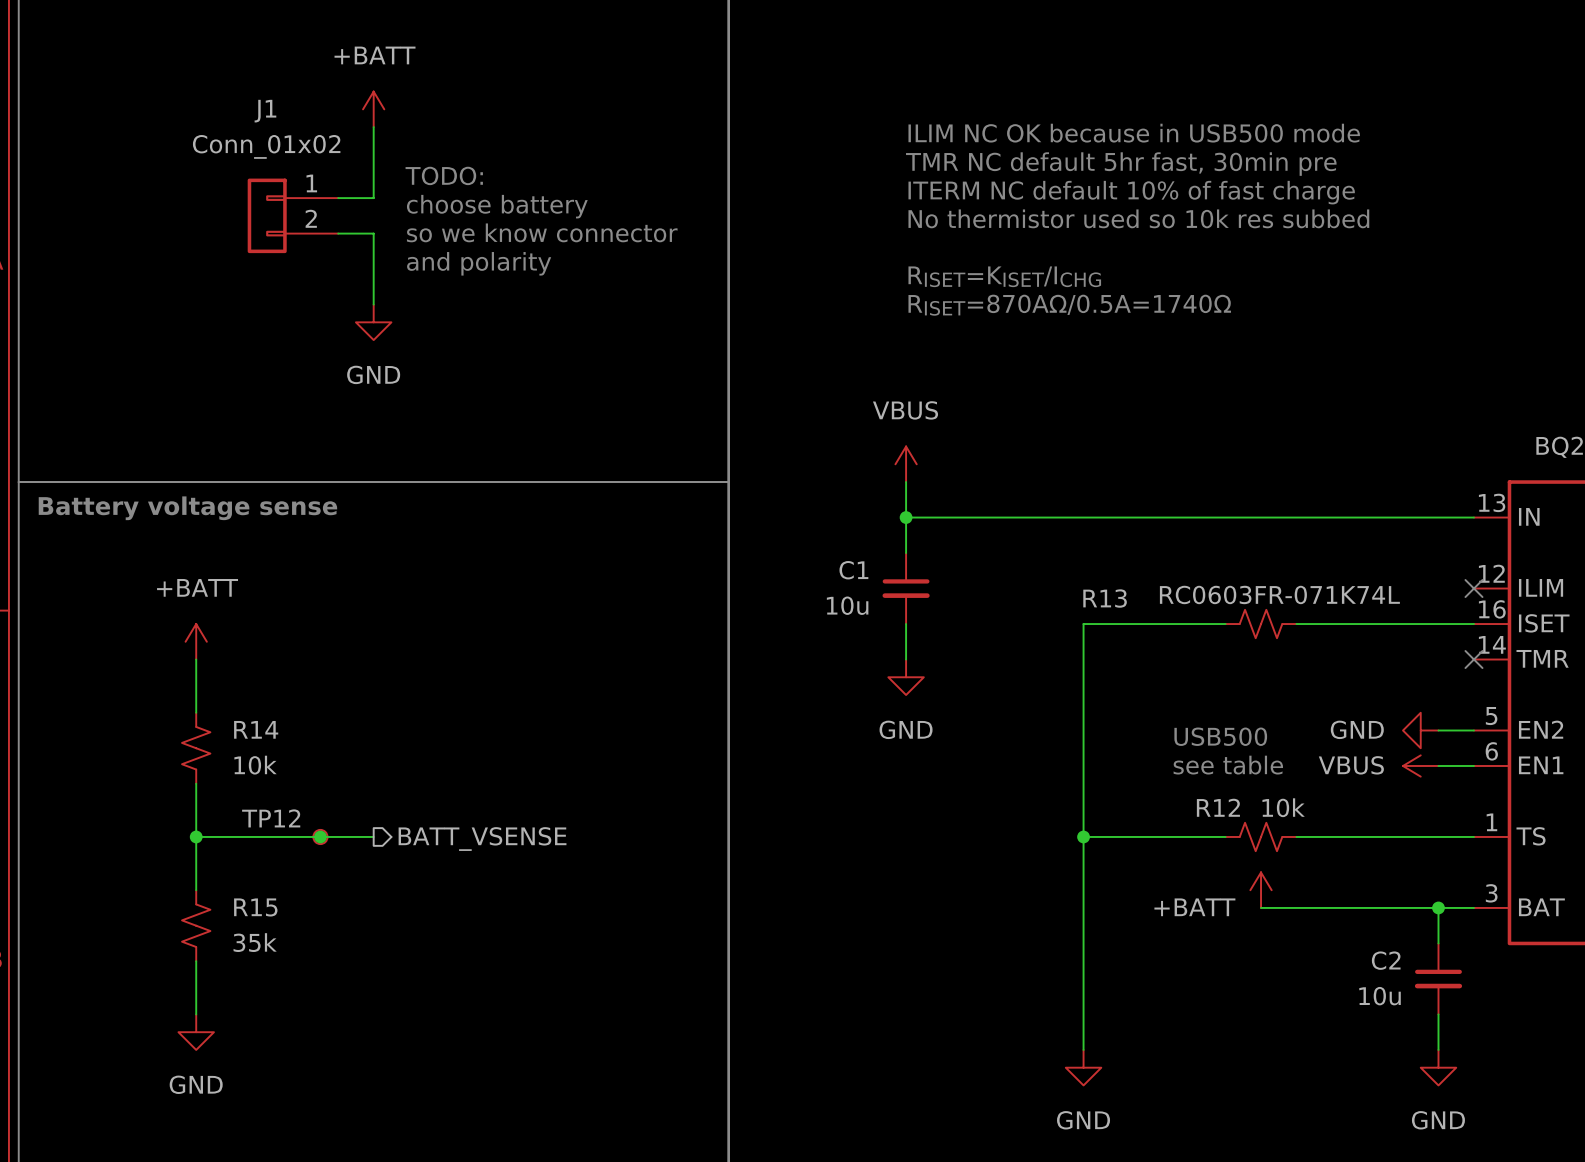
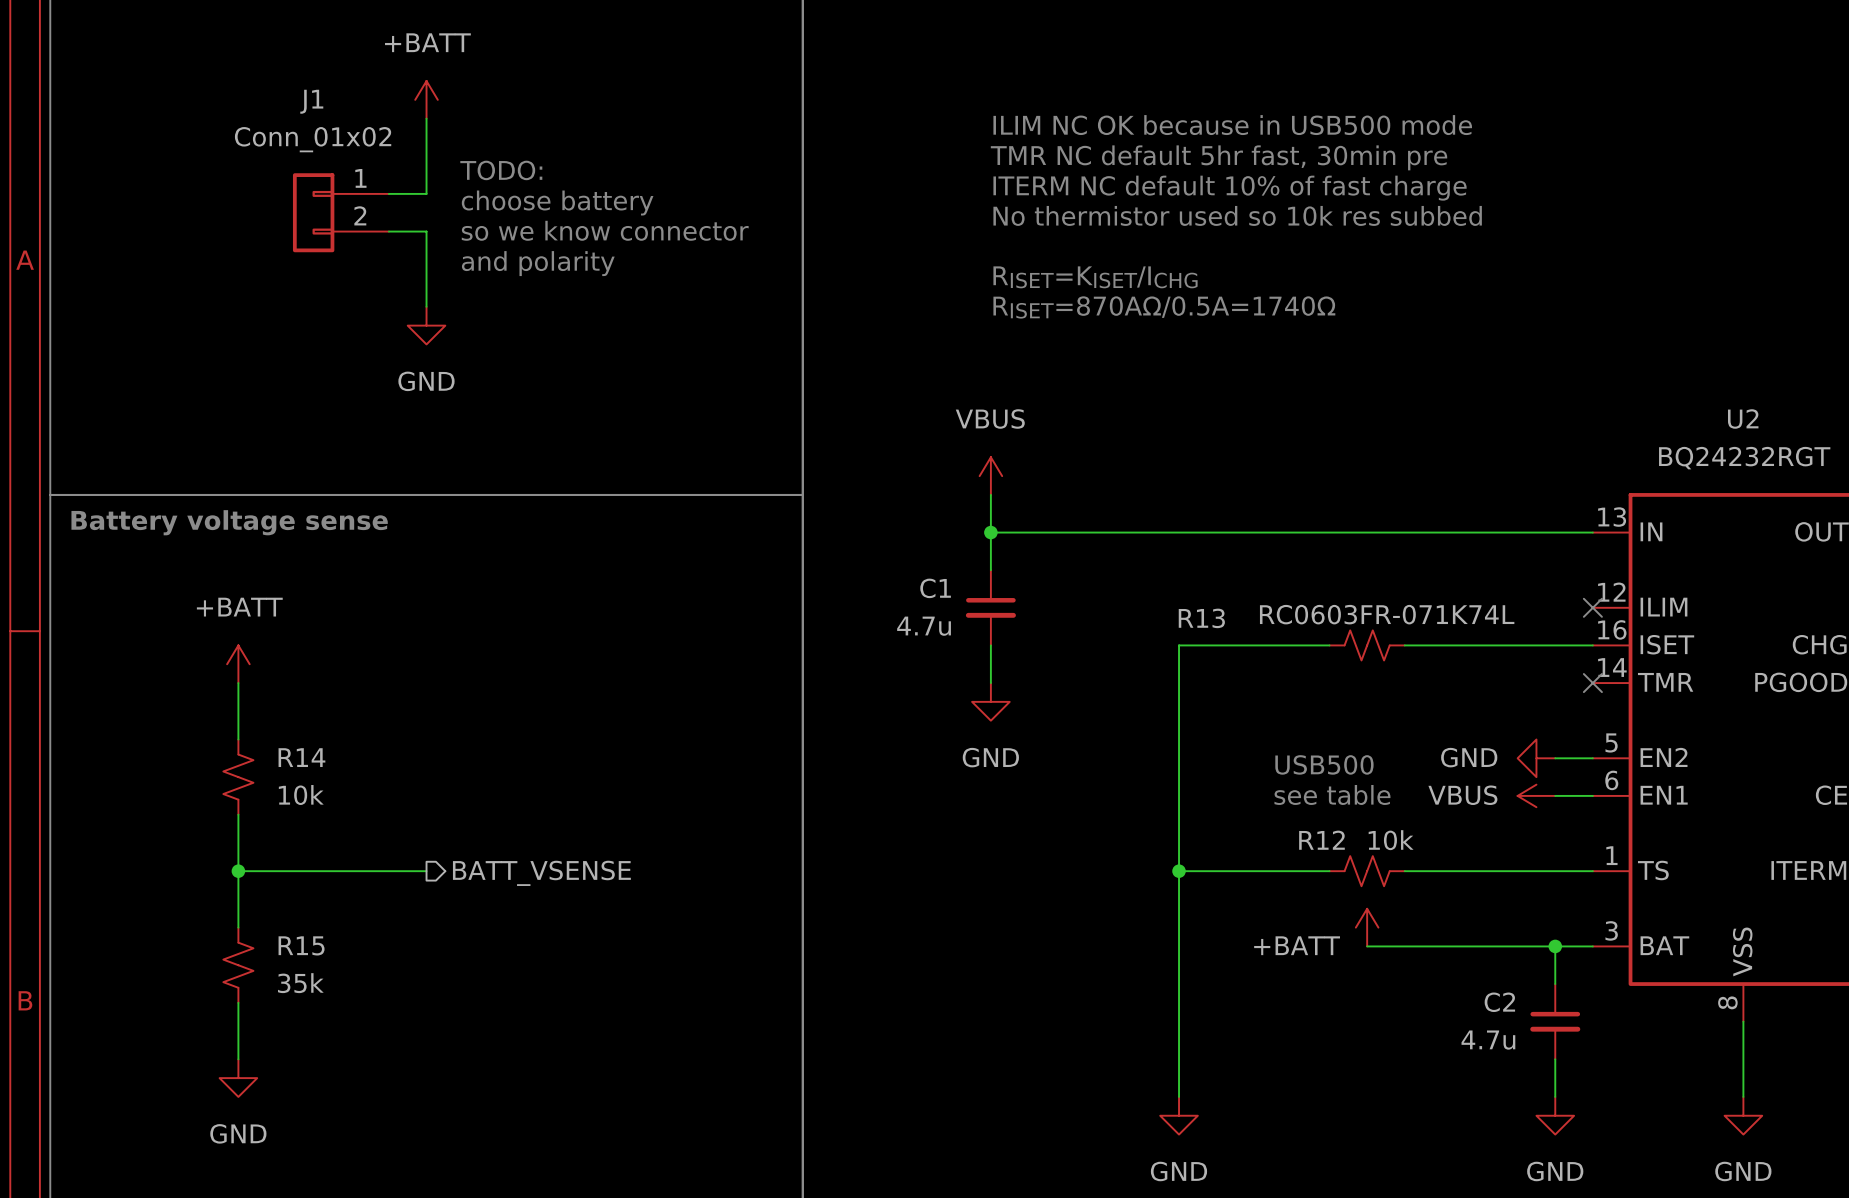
C1 value: 10u (847, 605) -> 4.7u (924, 626)
junction: (320, 836) -> none
TP12: (320, 836) -> none
C2 value: 10u (1380, 996) -> 4.7u (1488, 1040)

